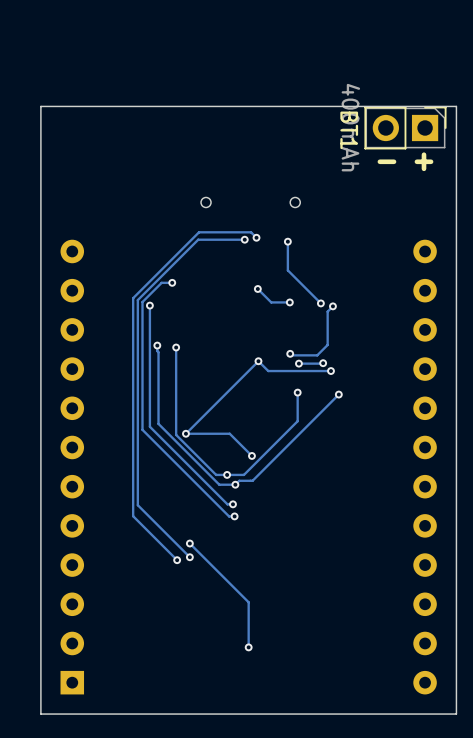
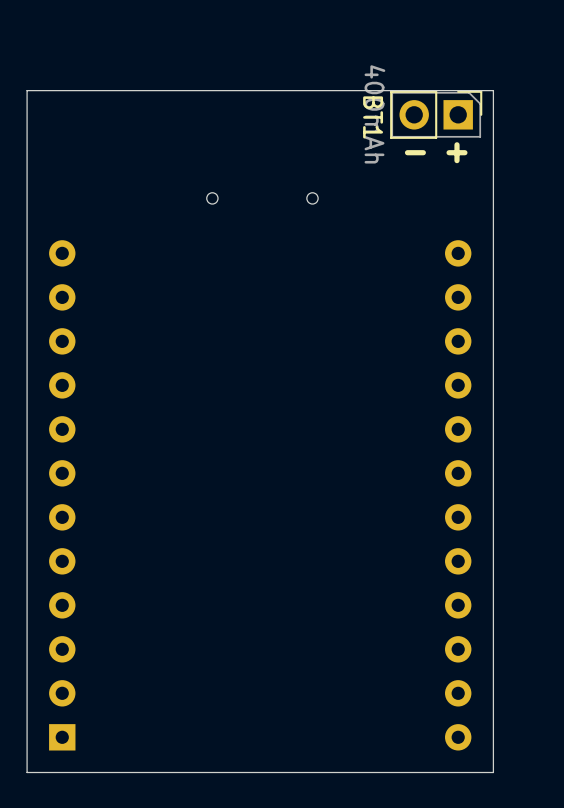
track: (256, 237) (251, 232) (199, 232) (133, 298) (133, 516) (177, 560) -> none
via: (256, 237) -> none
track: (244, 239) (198, 239) (137, 300) (137, 505) (189, 557) -> none
via: (244, 239) -> none
track: (287, 241) (287, 270) (320, 303) -> none
via: (287, 241) -> none
track: (172, 282) (161, 282) (142, 302) (142, 429) (229, 516) (234, 516) -> none
via: (172, 282) -> none
via: (257, 288) -> none
track: (259, 288) (271, 302) (289, 302) -> none
via: (289, 302) -> none
via: (320, 303) -> none
track: (149, 305) (149, 426) (227, 504) (232, 504) -> none
via: (149, 305) -> none
track: (332, 306) (327, 311) (327, 344) (317, 355) (287, 355) -> none
via: (332, 306) -> none
track: (157, 345) (158, 423) (219, 484) (235, 484) (239, 480) (252, 480) (338, 394) -> none
via: (157, 345) -> none
track: (176, 347) (176, 434) (216, 474) (243, 474) (297, 421) (297, 392) -> none
via: (176, 347) -> none
via: (290, 353) -> none
via: (258, 361) -> none
via: (298, 363) -> none
track: (323, 363) (298, 363) -> none
via: (323, 363) -> none
track: (330, 371) (268, 371) (258, 361) (185, 433) (229, 433) (251, 455) -> none
via: (330, 371) -> none
via: (297, 392) -> none
via: (338, 394) -> none
via: (185, 433) -> none
via: (251, 455) -> none
via: (227, 474) -> none
via: (235, 484) -> none
via: (232, 504) -> none
via: (234, 516) -> none
track: (189, 543) (248, 602) (248, 647) -> none
via: (189, 543) -> none
via: (189, 557) -> none
via: (177, 560) -> none
via: (248, 647) -> none

